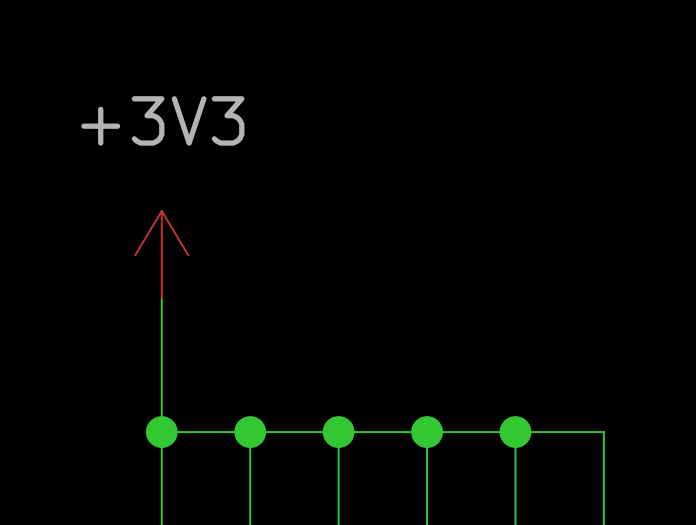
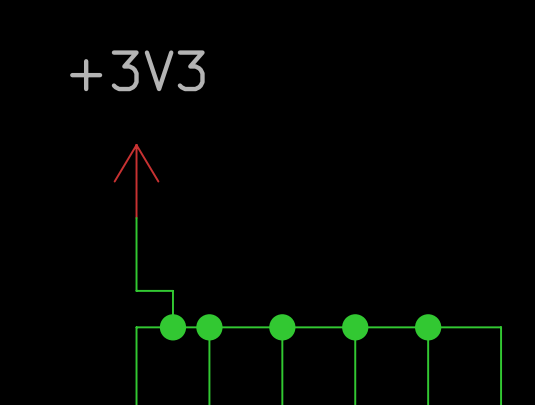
wire: (161, 387) (161, 432) -> (136, 290) (172, 290) (172, 327)
junction position: (161, 432) -> (172, 327)

